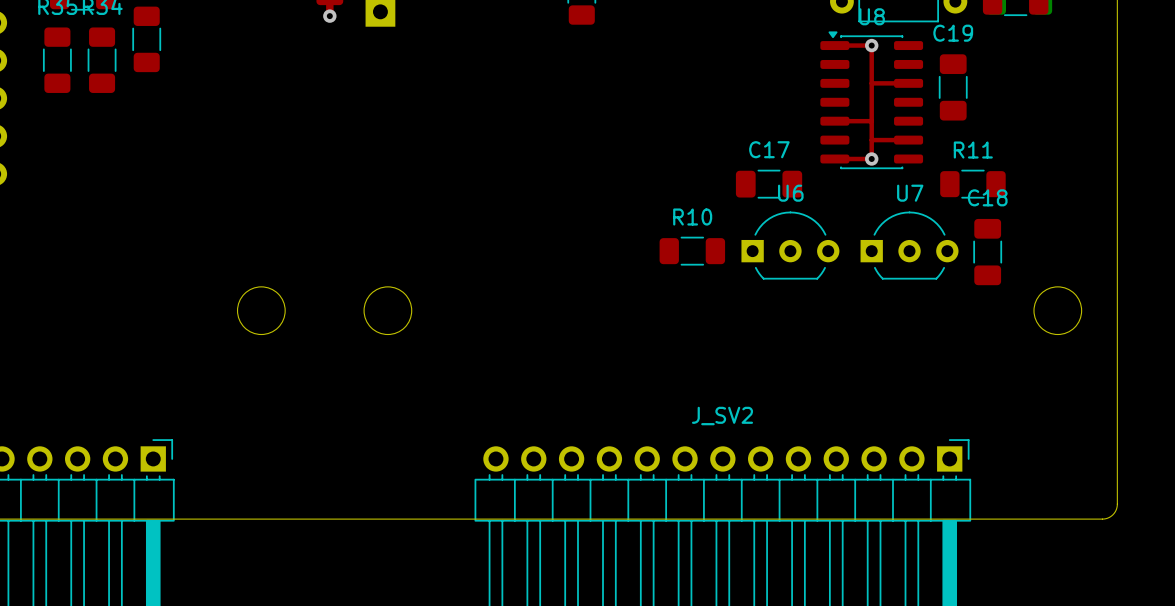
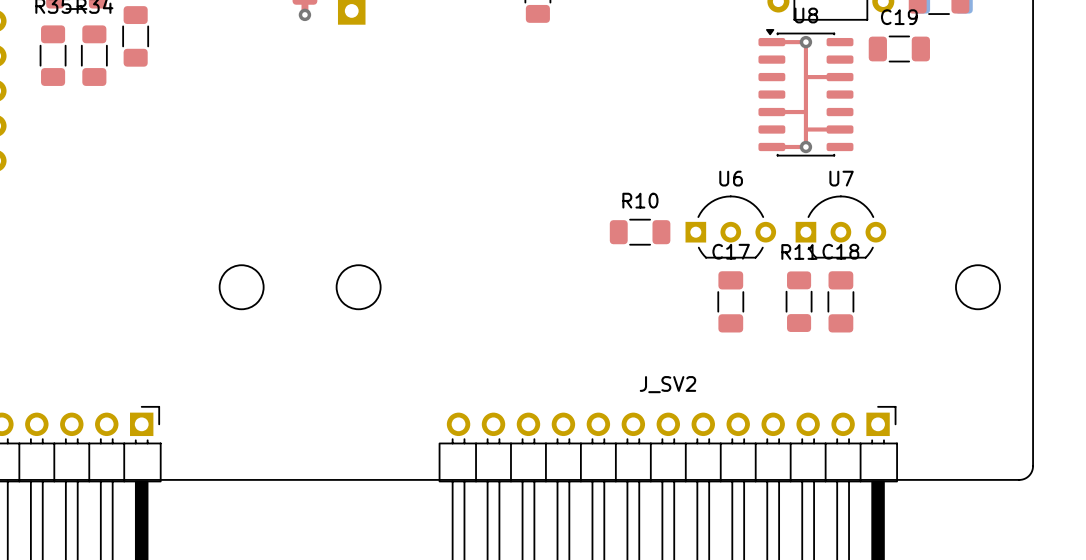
C19 rotation: 0° (953, 87) -> 90° clockwise (899, 48)
C17 rotation: 0° (769, 184) -> 90° clockwise (730, 301)
C17 position: (769, 184) -> (730, 301)
R11 rotation: 0° (972, 184) -> 90° clockwise (799, 301)
R11 position: (972, 184) -> (799, 301)
C18 position: (987, 252) -> (840, 301)

